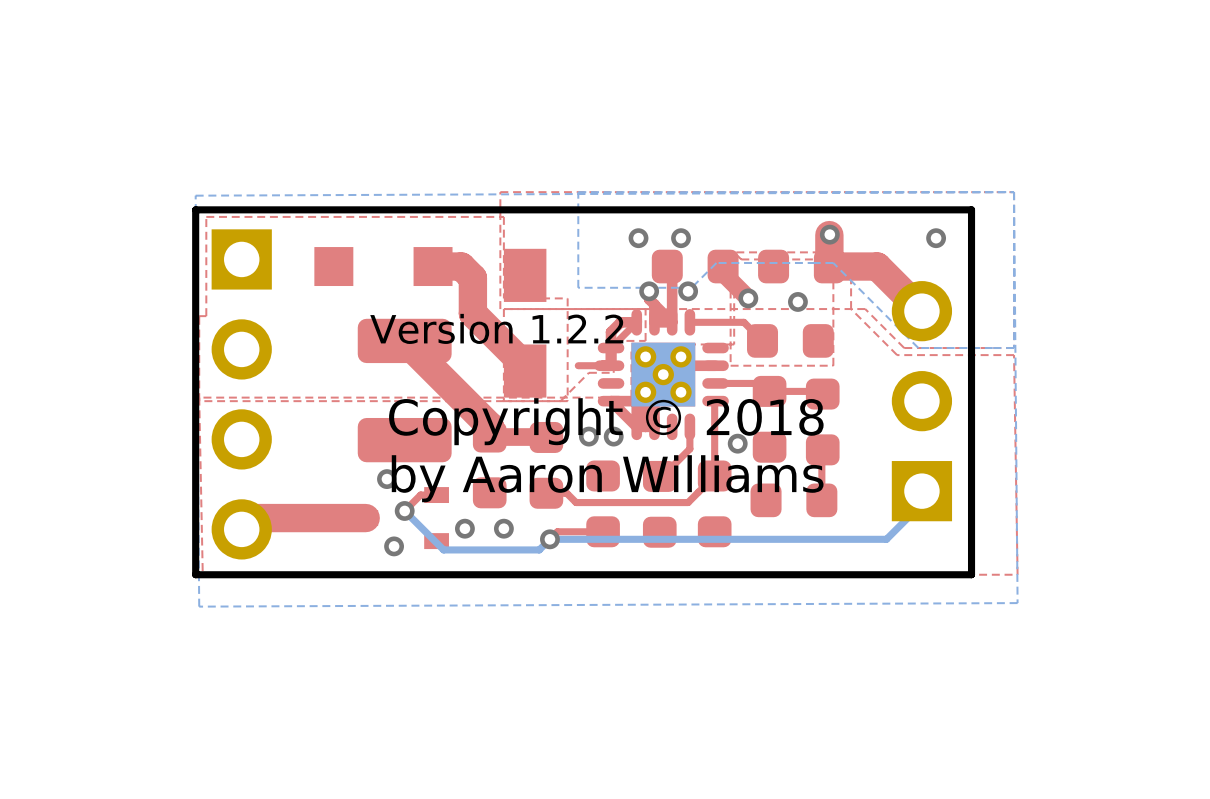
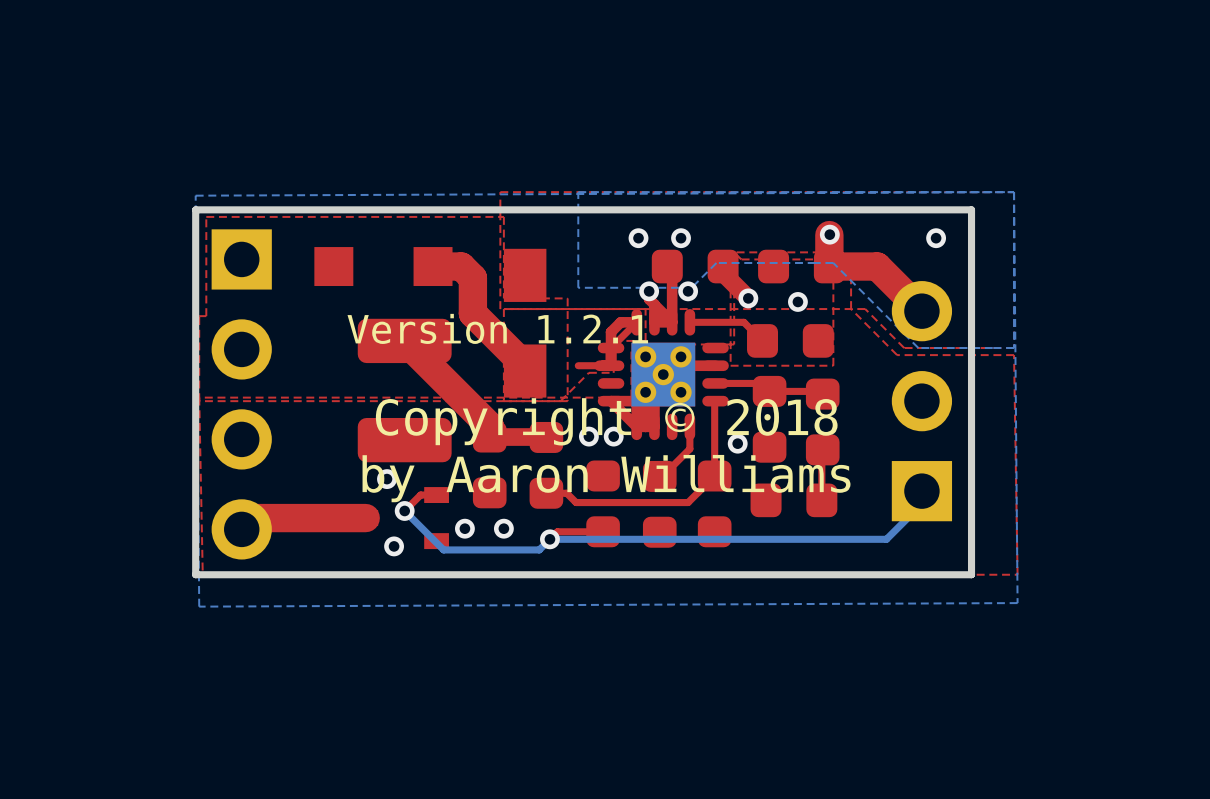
text: Version 1.2.2 (496, 328) -> Version 1.2.1 (497, 328)

